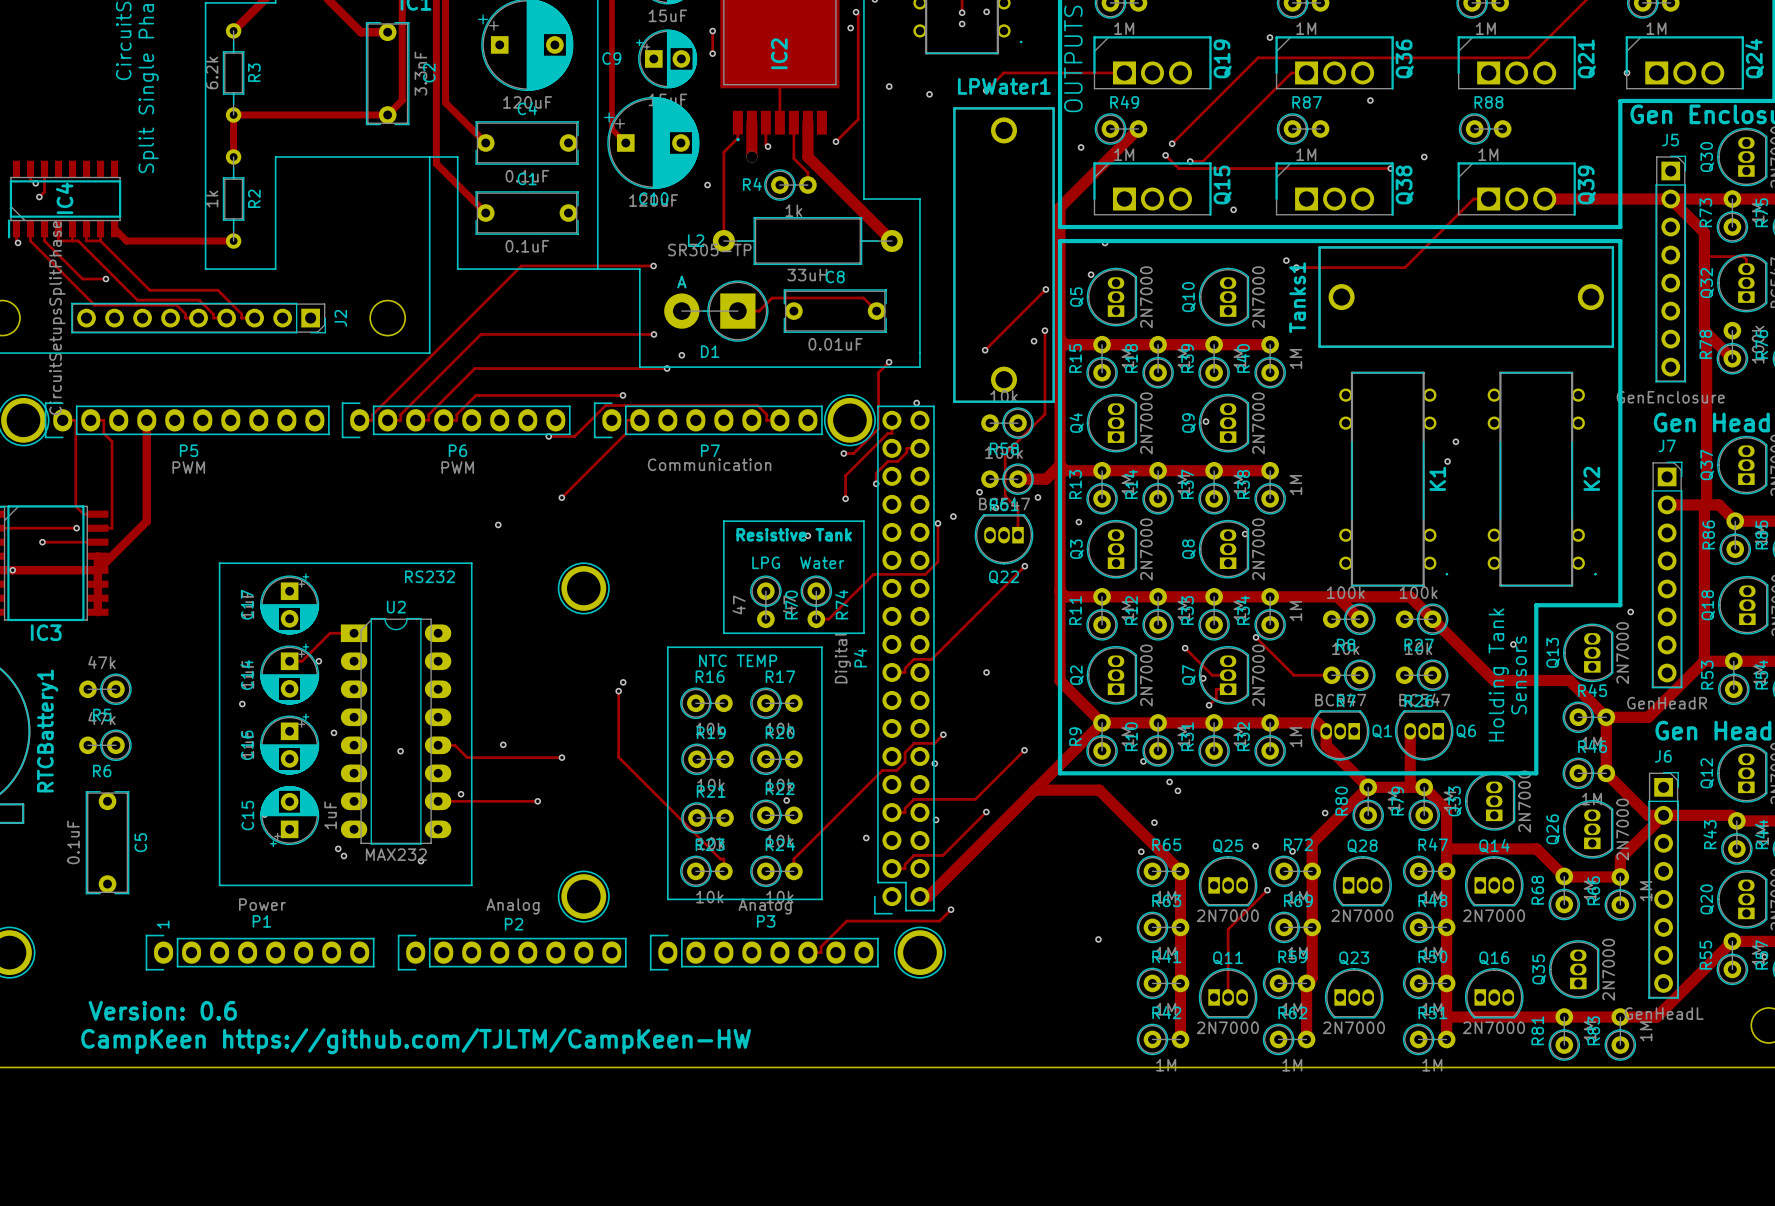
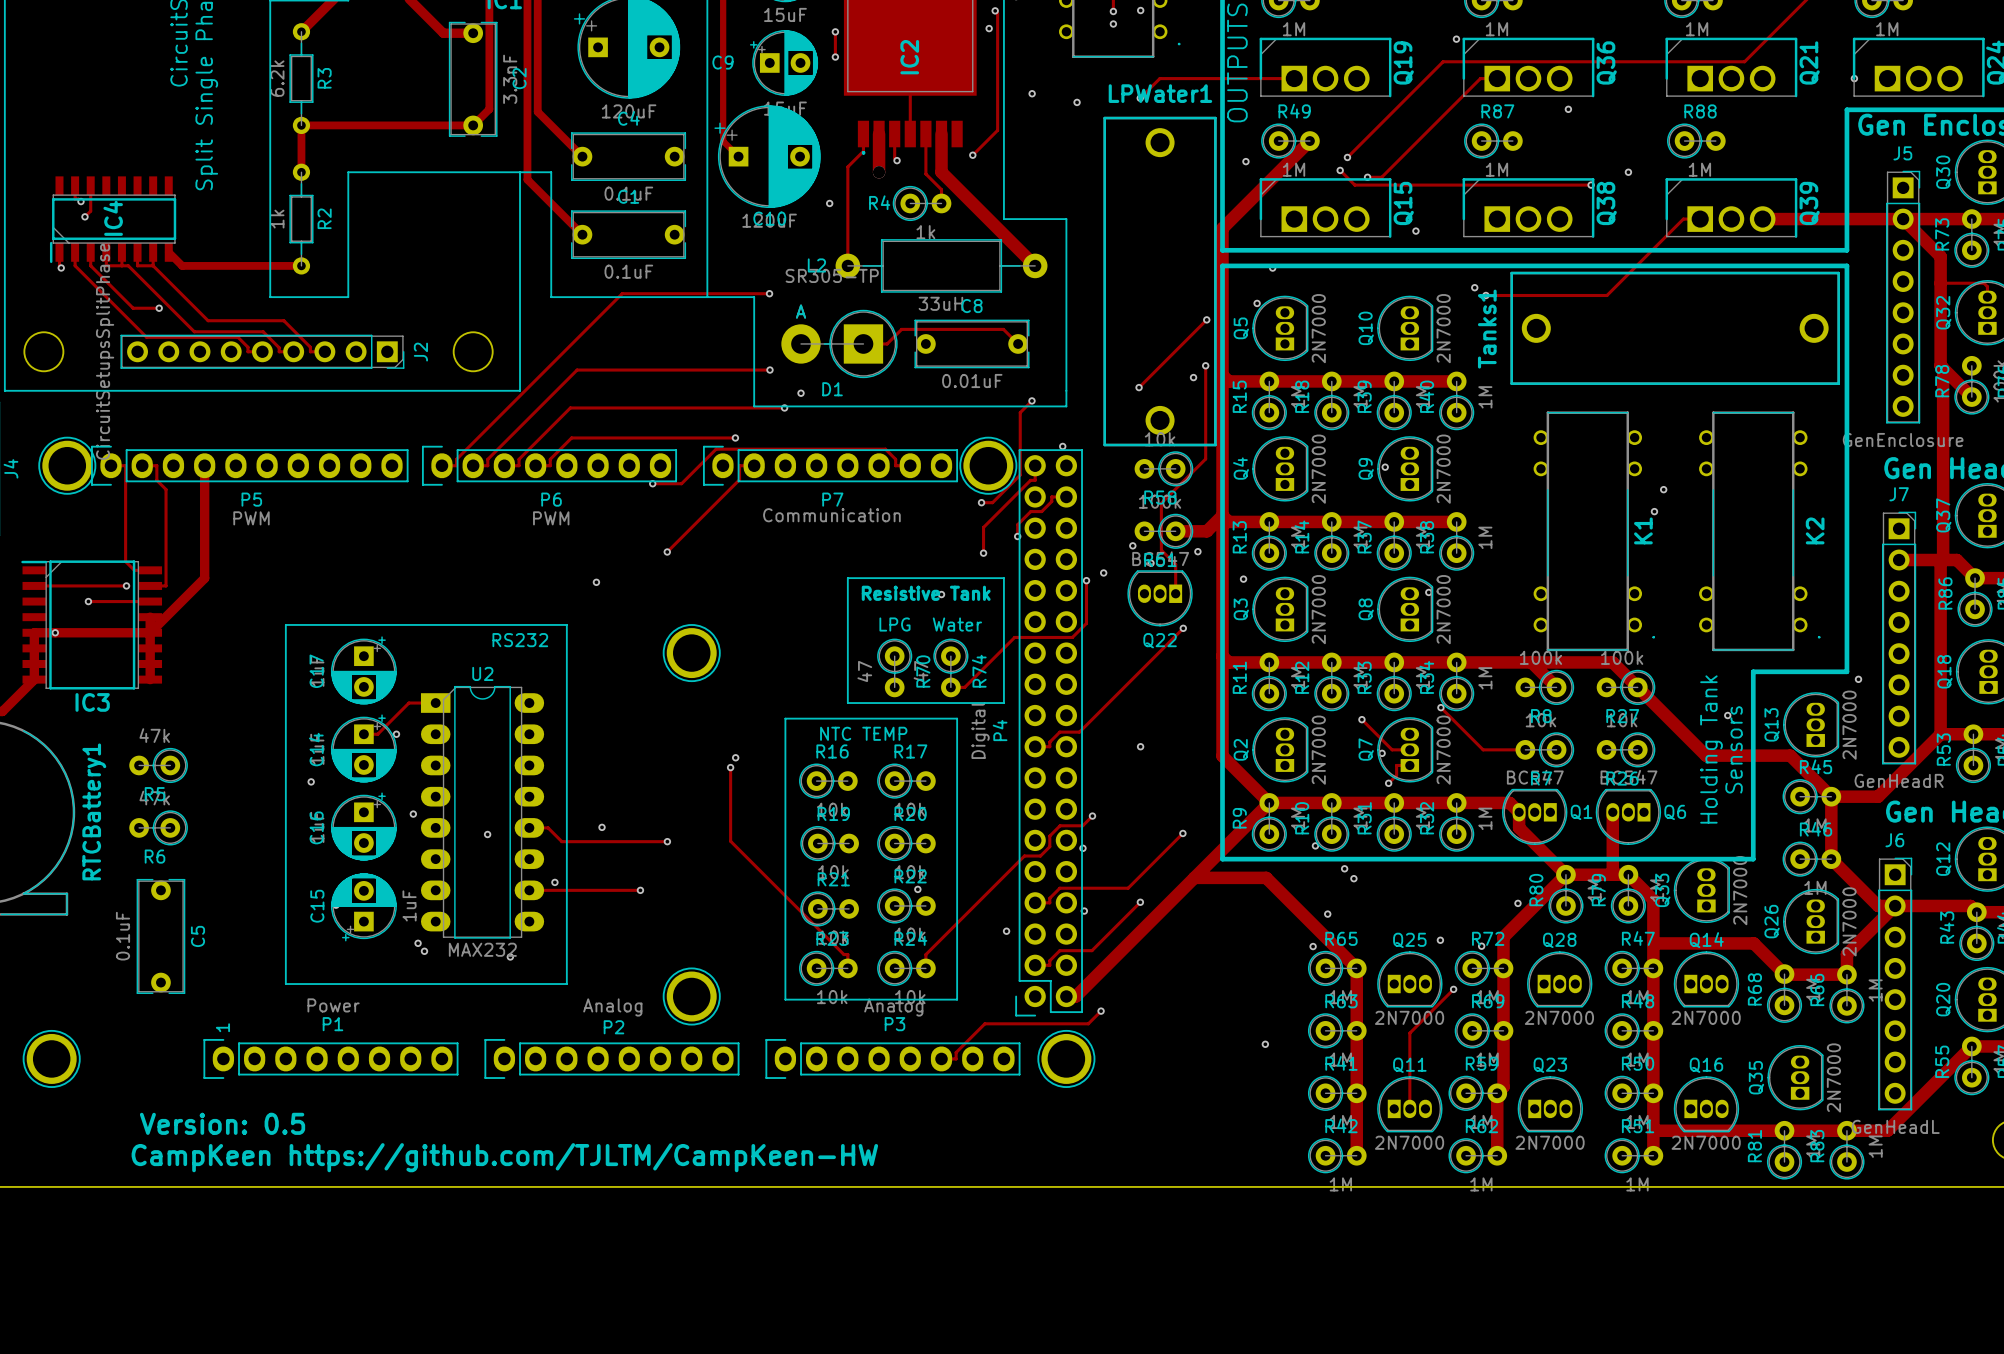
text: Version: 0.6 (162, 1010) -> Version: 0.5 (222, 1123)

